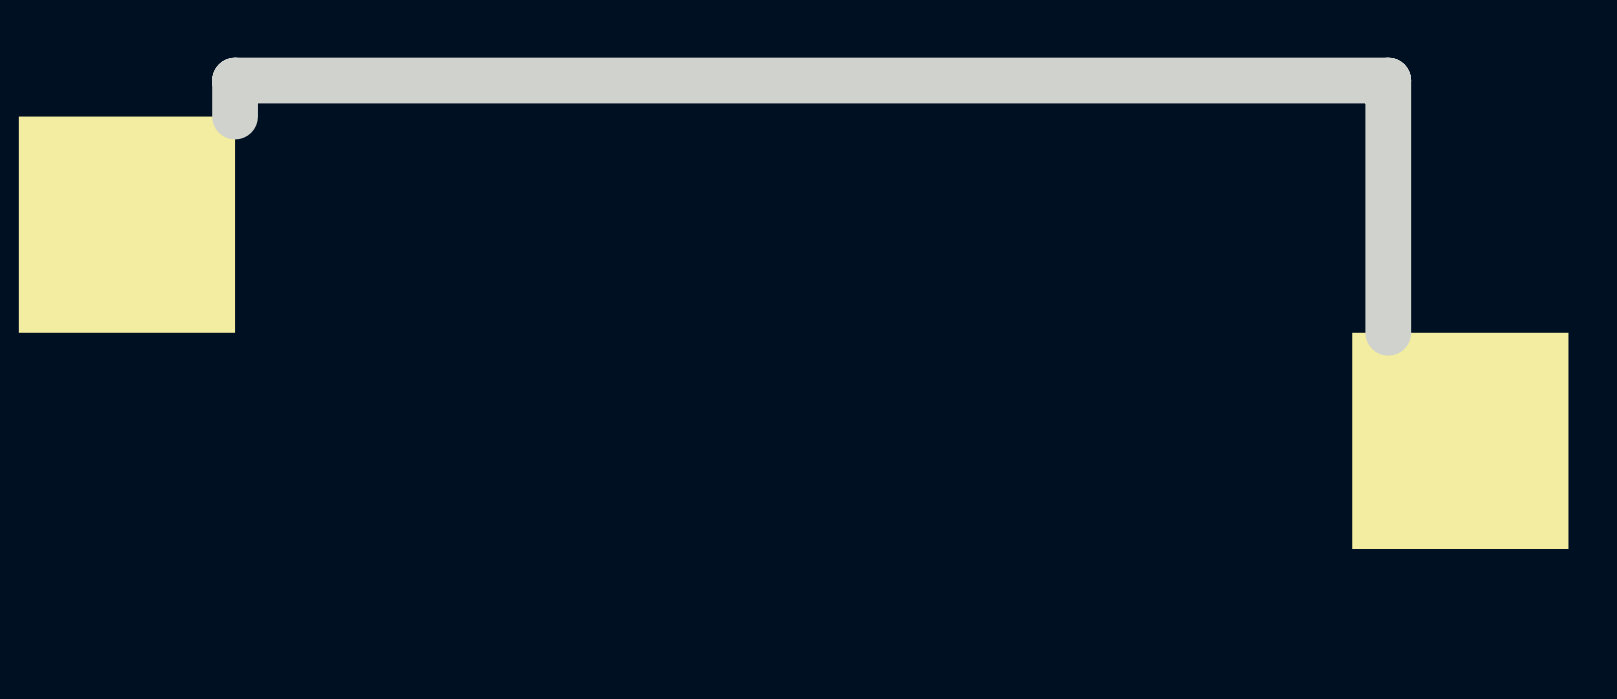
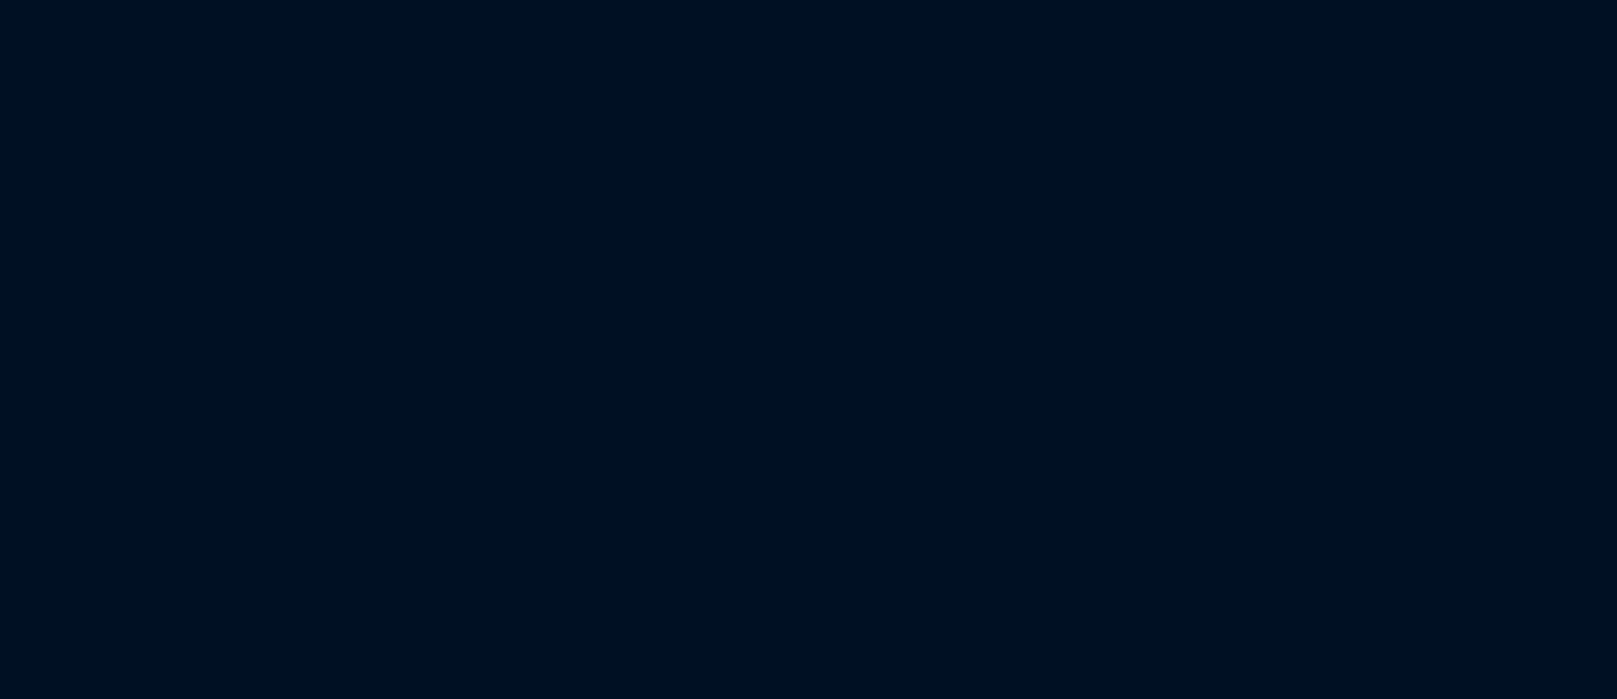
drawing: [18, 116, 236, 333] -> none
board edge: (235, 116) (235, 80) (1388, 80) (1388, 332) -> none
drawing: [1352, 332, 1569, 550] -> none

